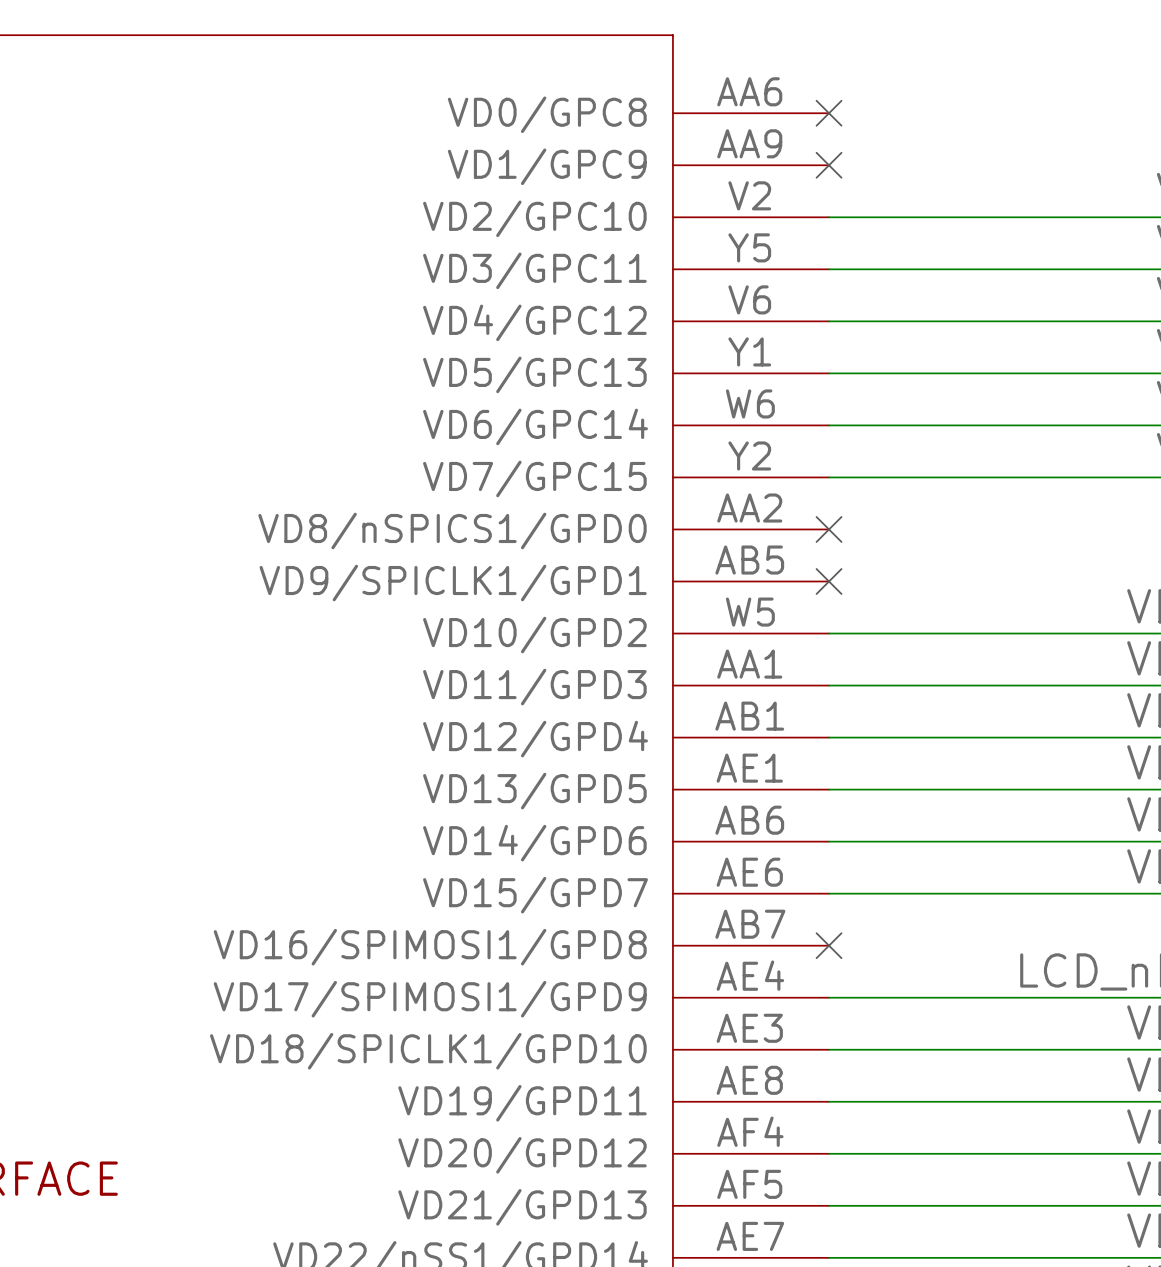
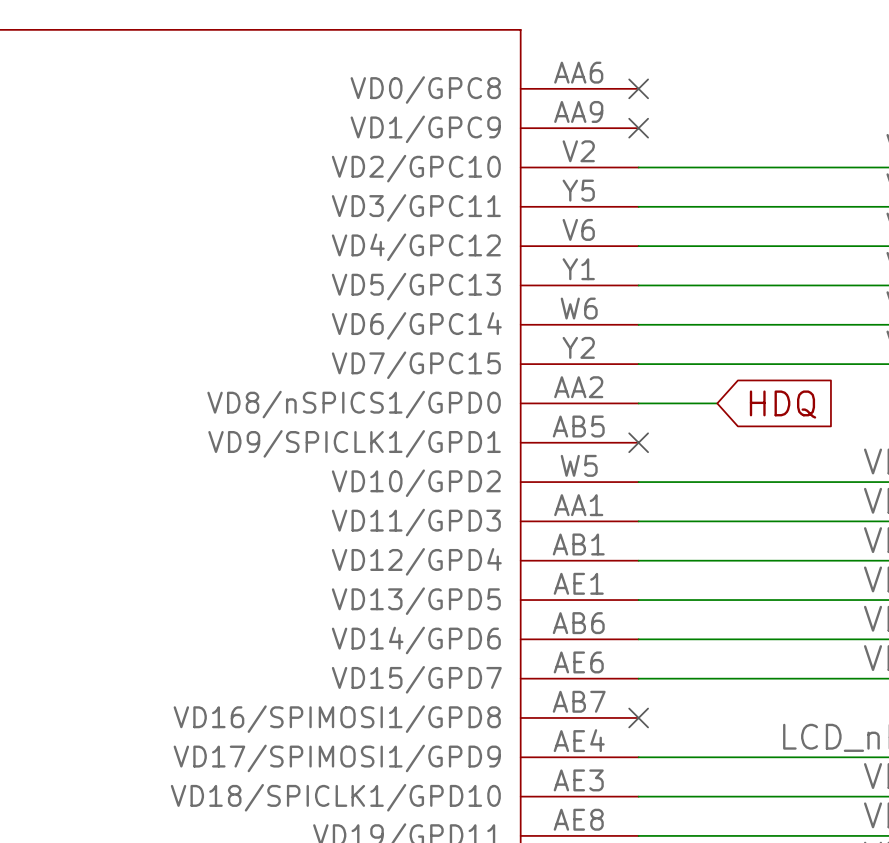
wire: none -> (638, 403) (717, 403)
no-connect mark: (829, 529) -> none
global label: none -> HDQ (783, 404)

